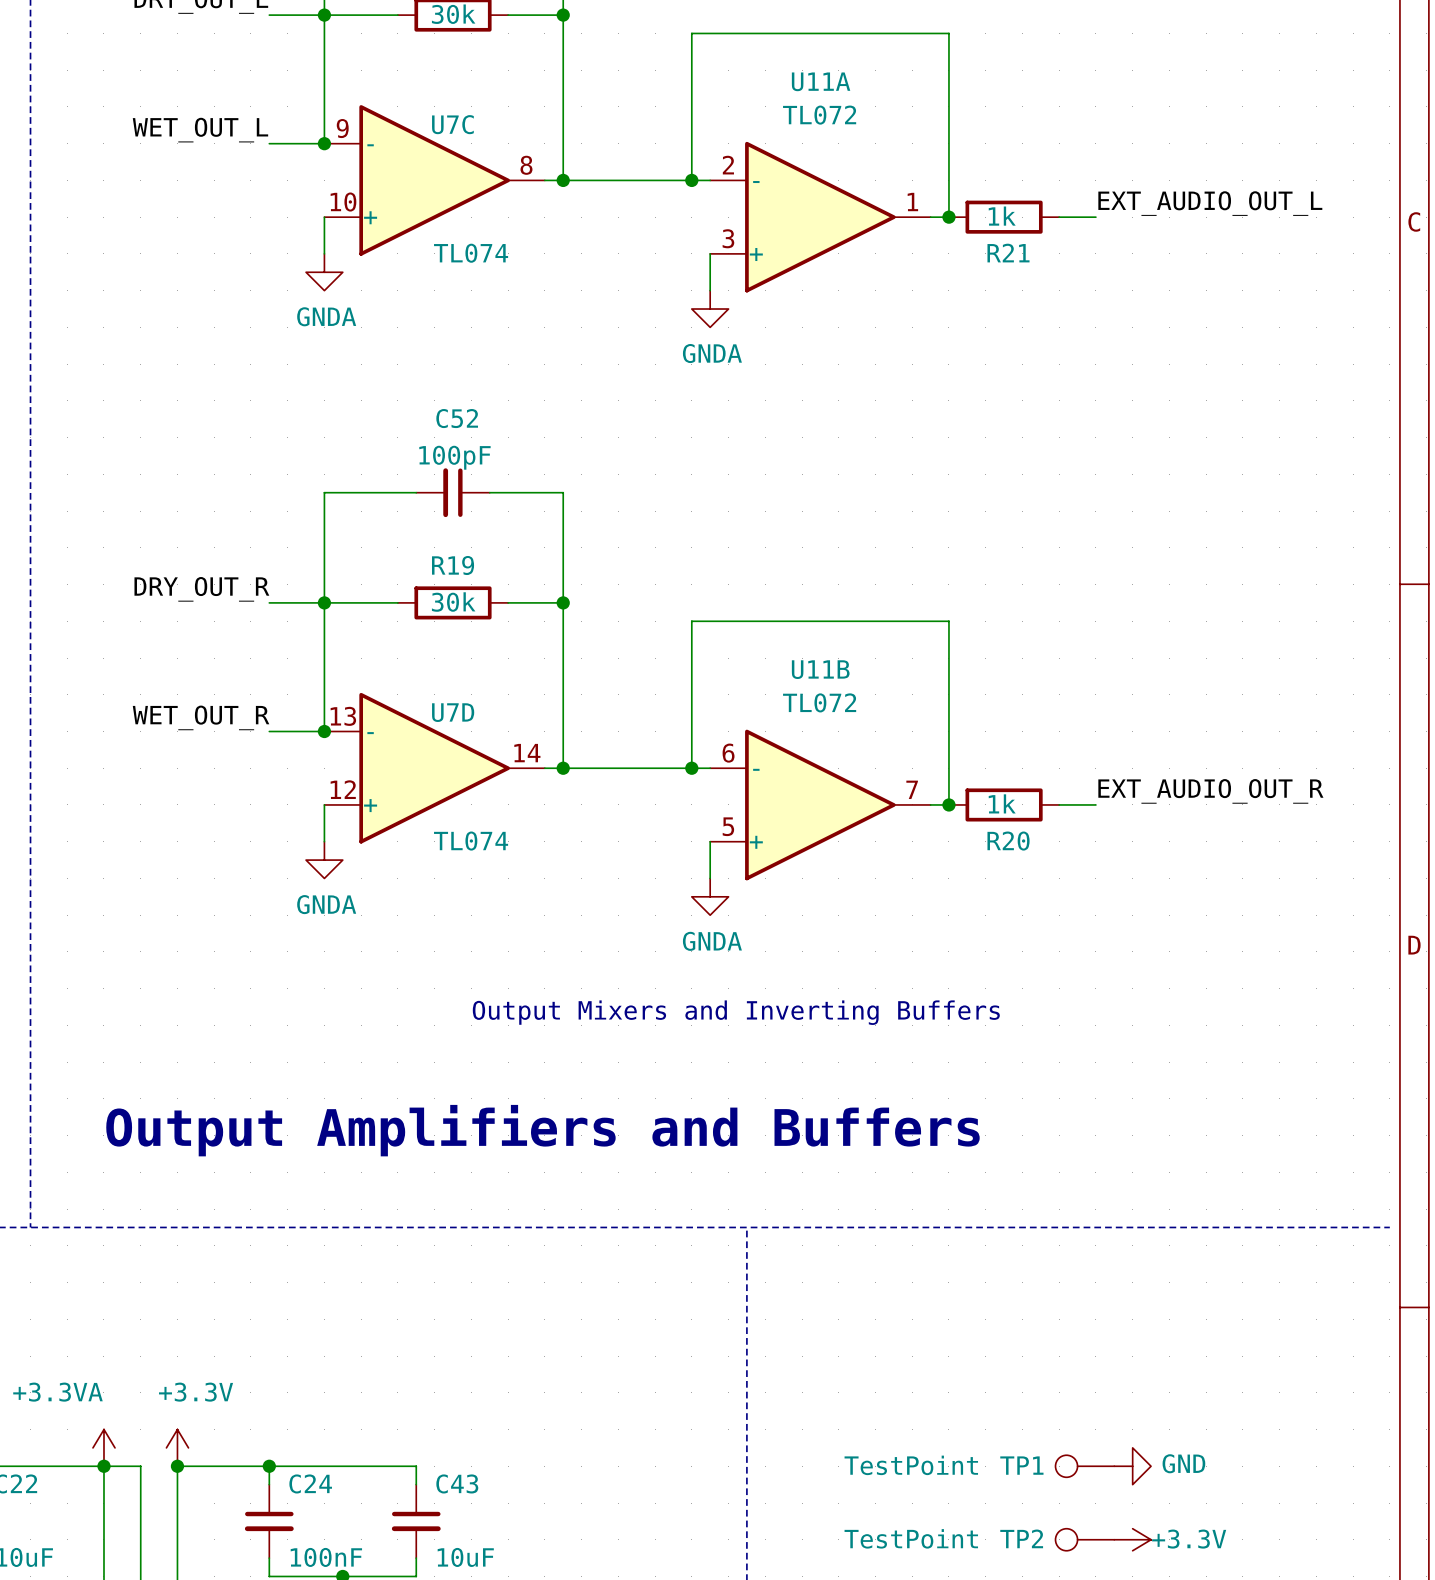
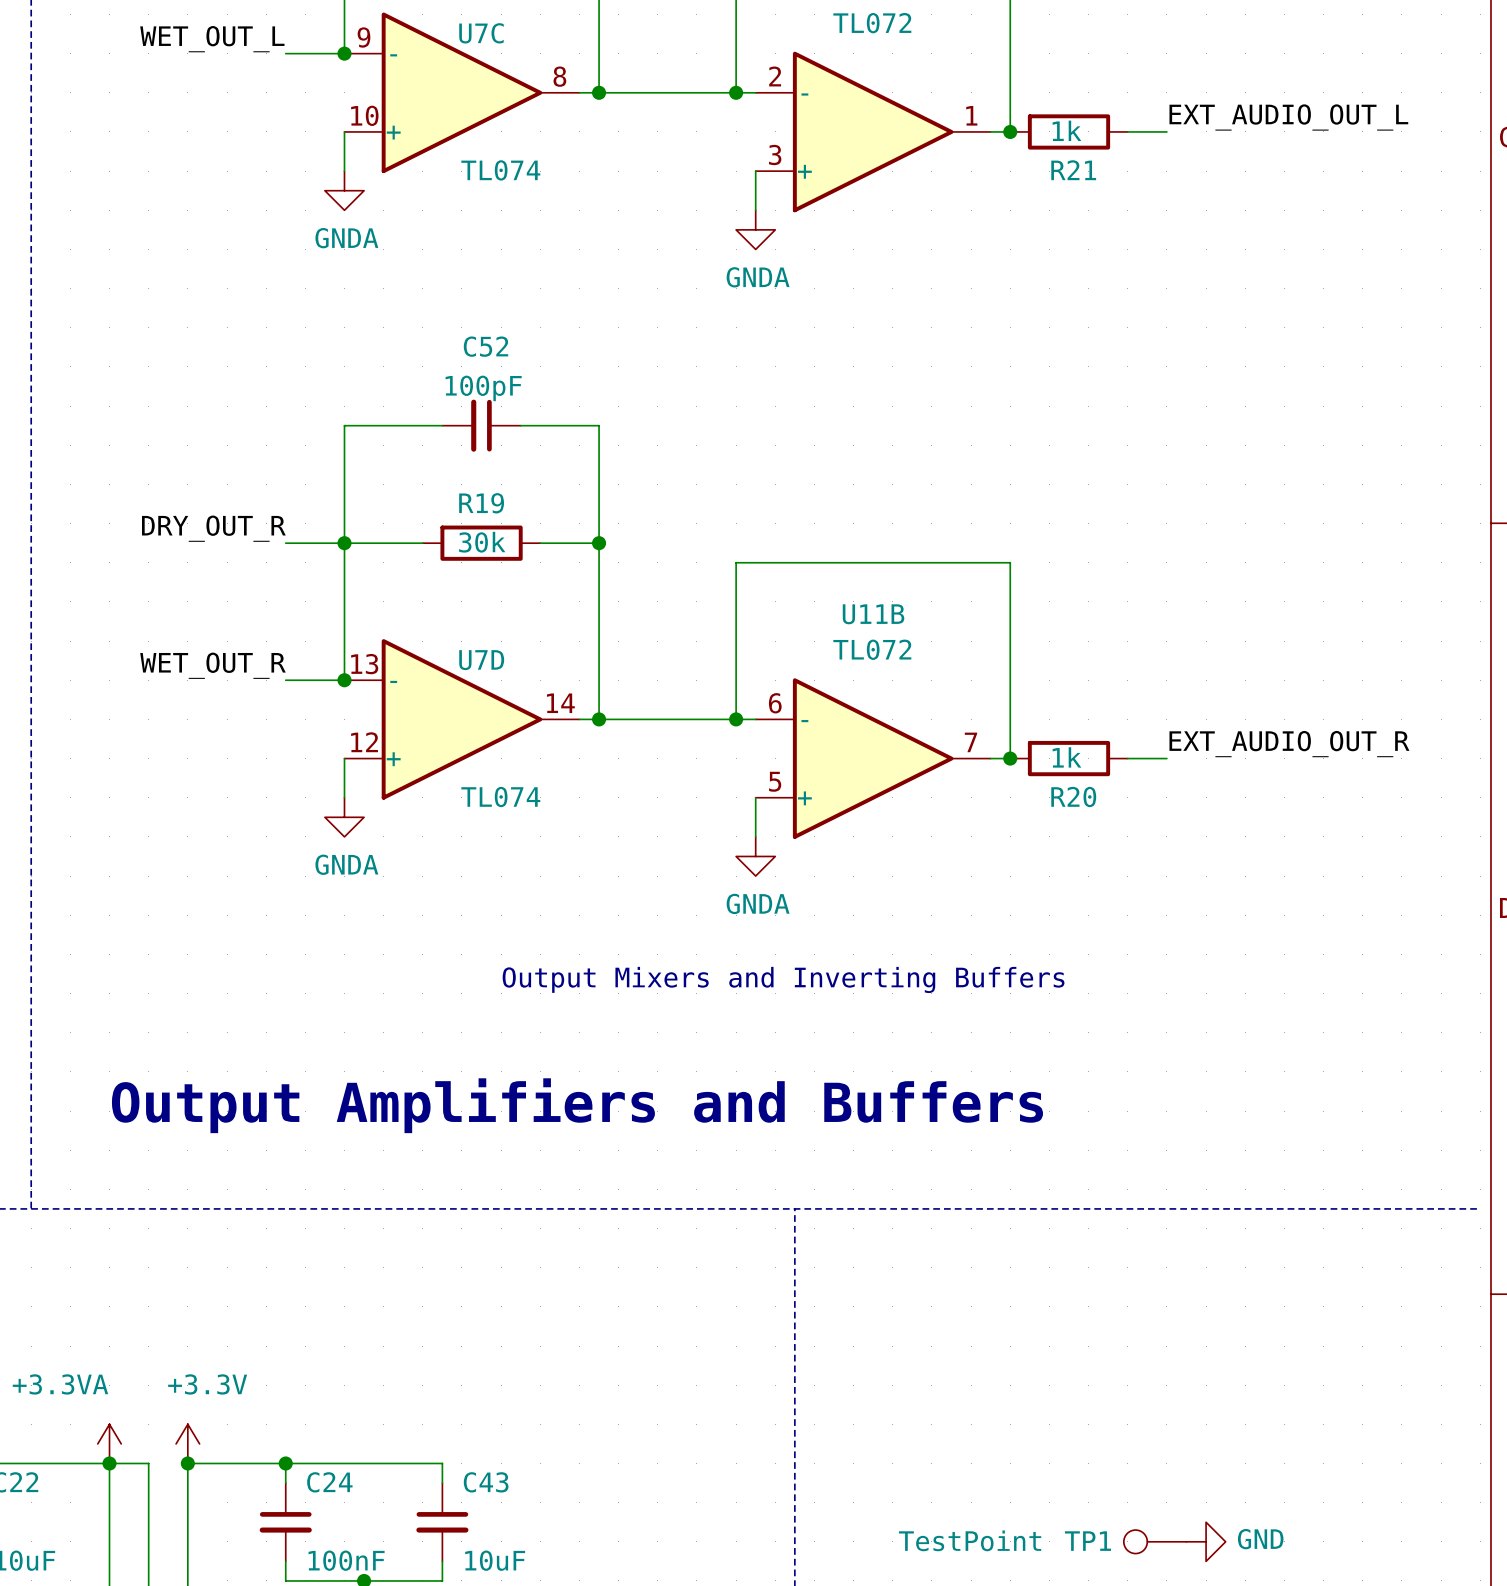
TP1: TestPoint (1084, 1466) -> none
power symbol: GND (1132, 1466) -> none
TP2 name: TP2 (1021, 1538) -> TP1 (1087, 1541)
power symbol: +3.3V (1132, 1539) -> GND (1206, 1541)

